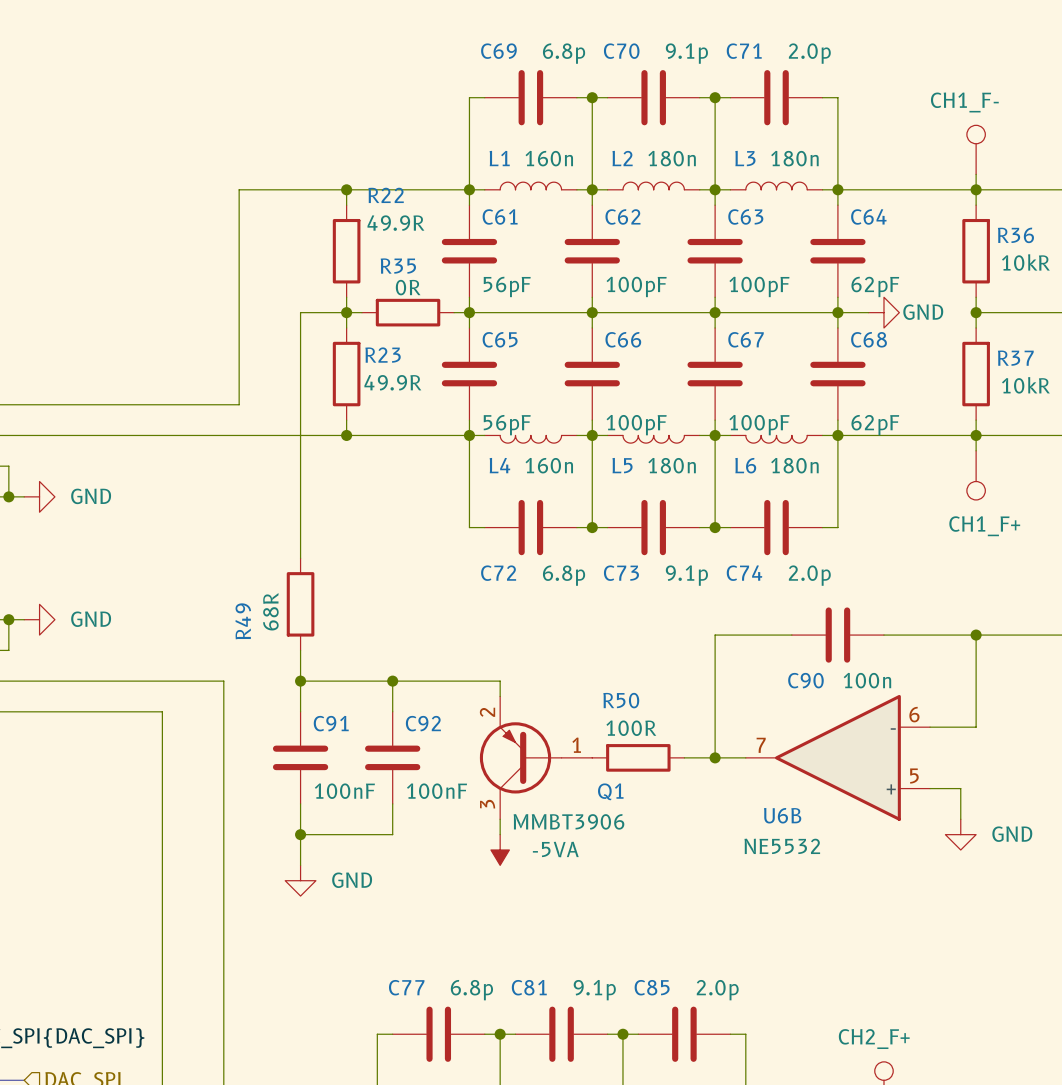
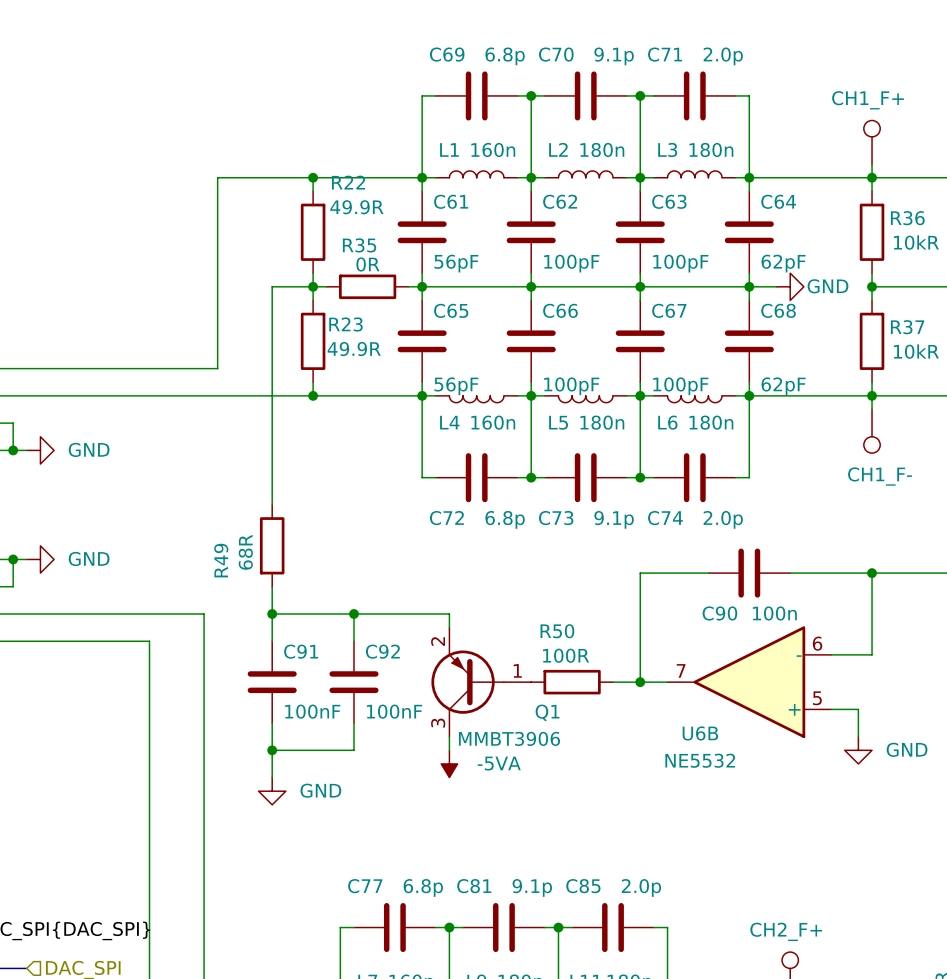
part value: CH1_F- (964, 102) -> CH1_F+ (868, 100)
part value: CH1_F+ (984, 526) -> CH1_F- (880, 476)

